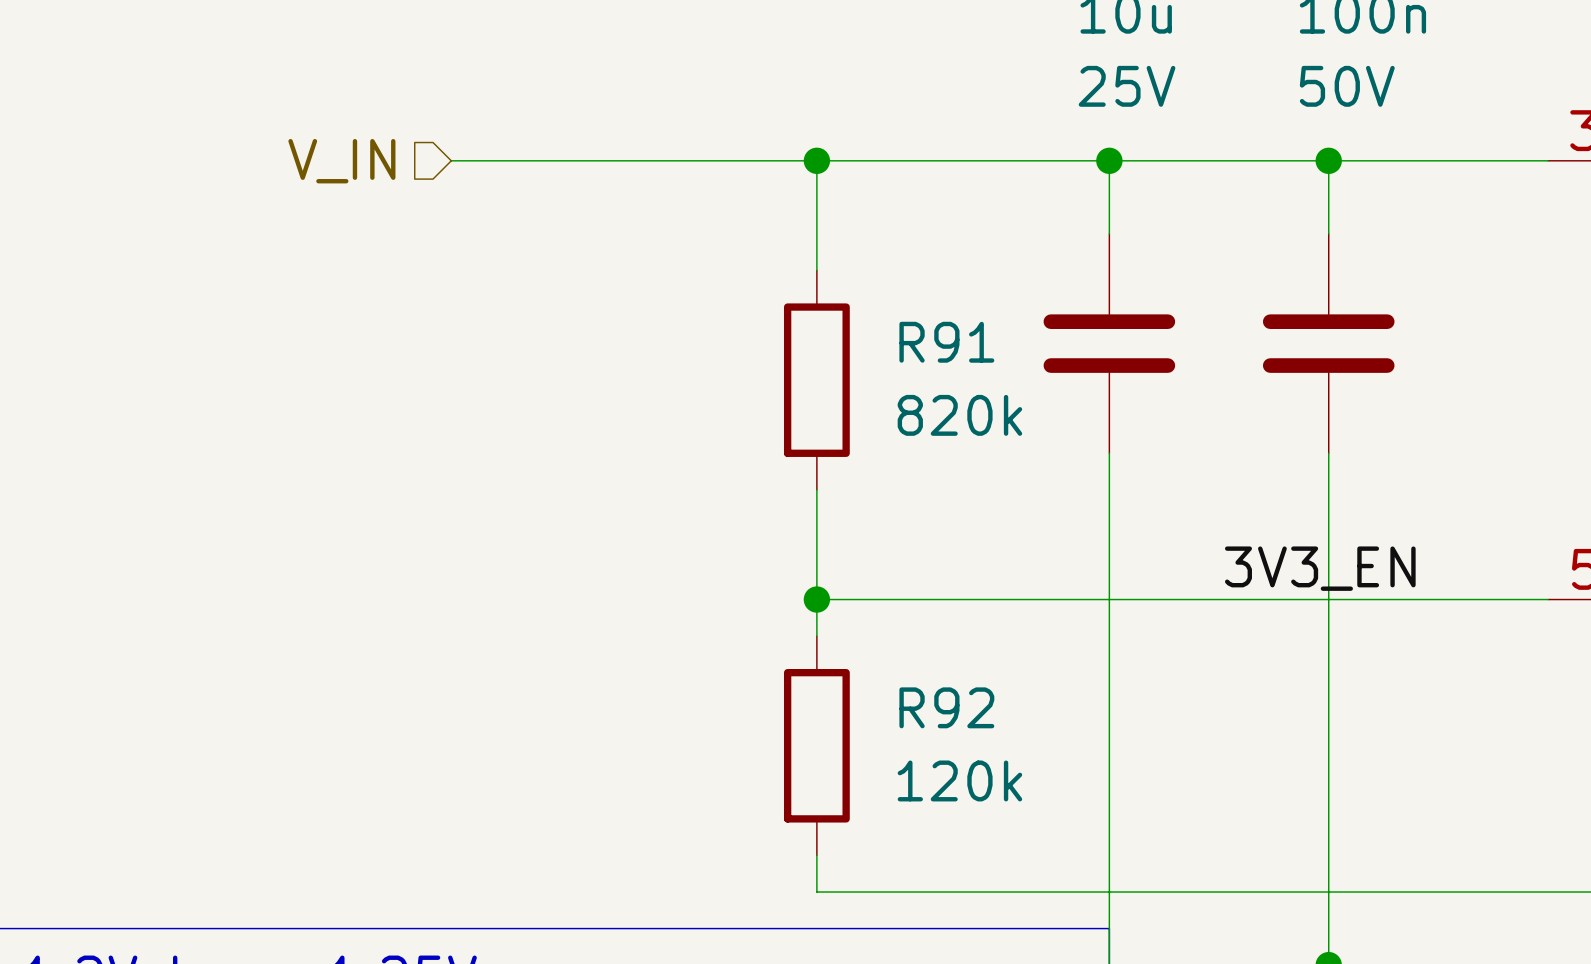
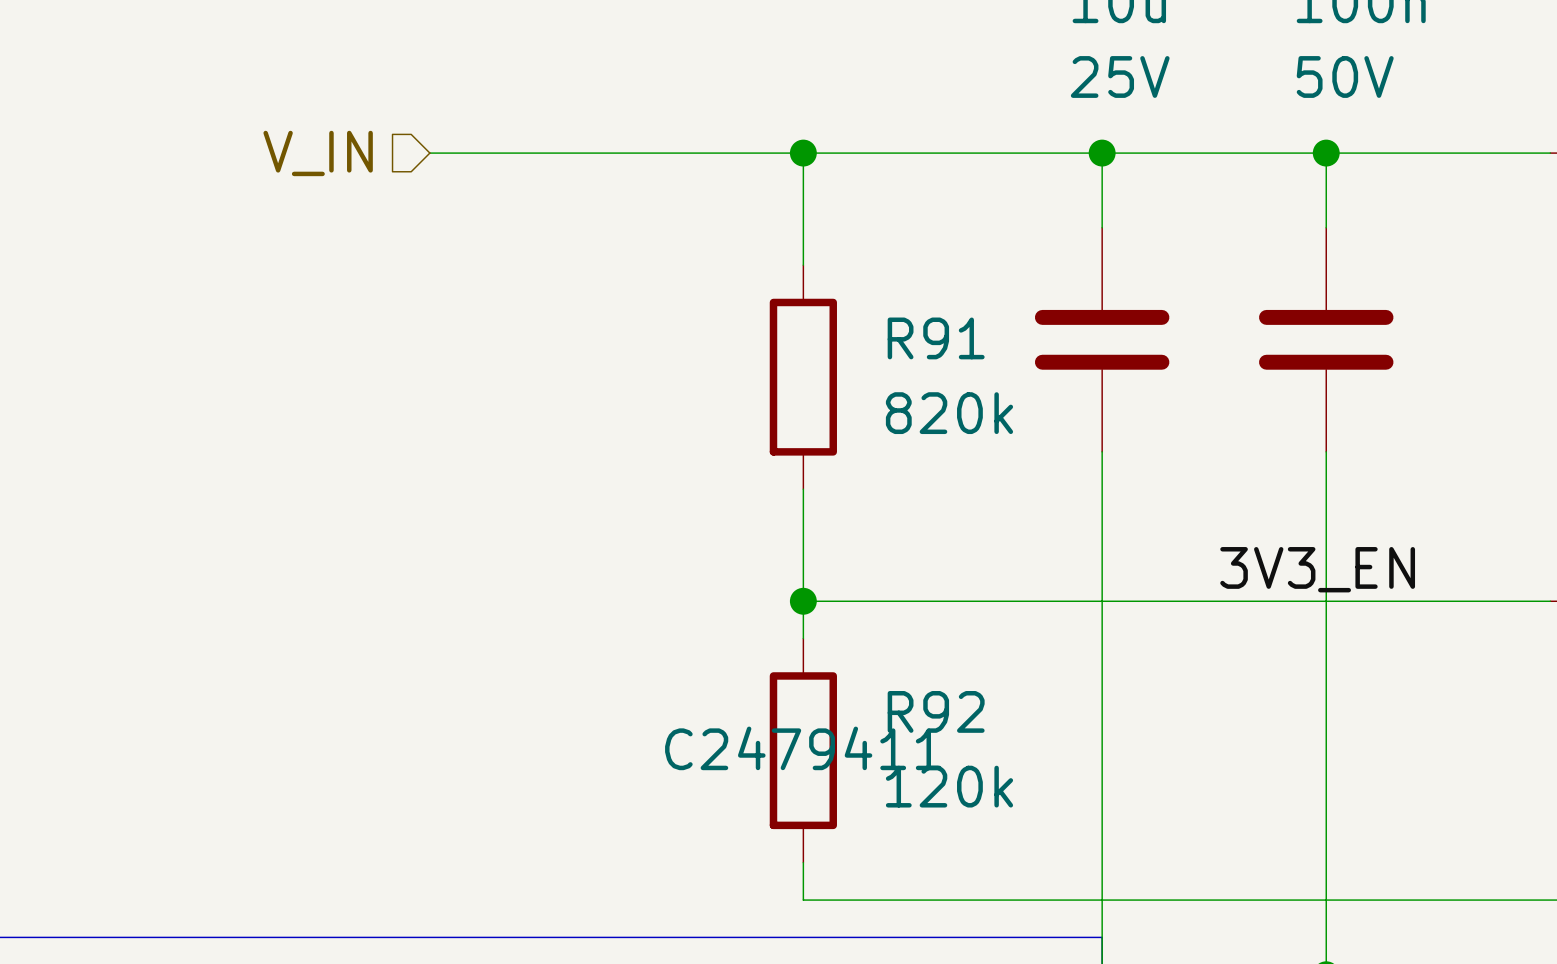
R92 text: none -> C2479411 (803, 748)

